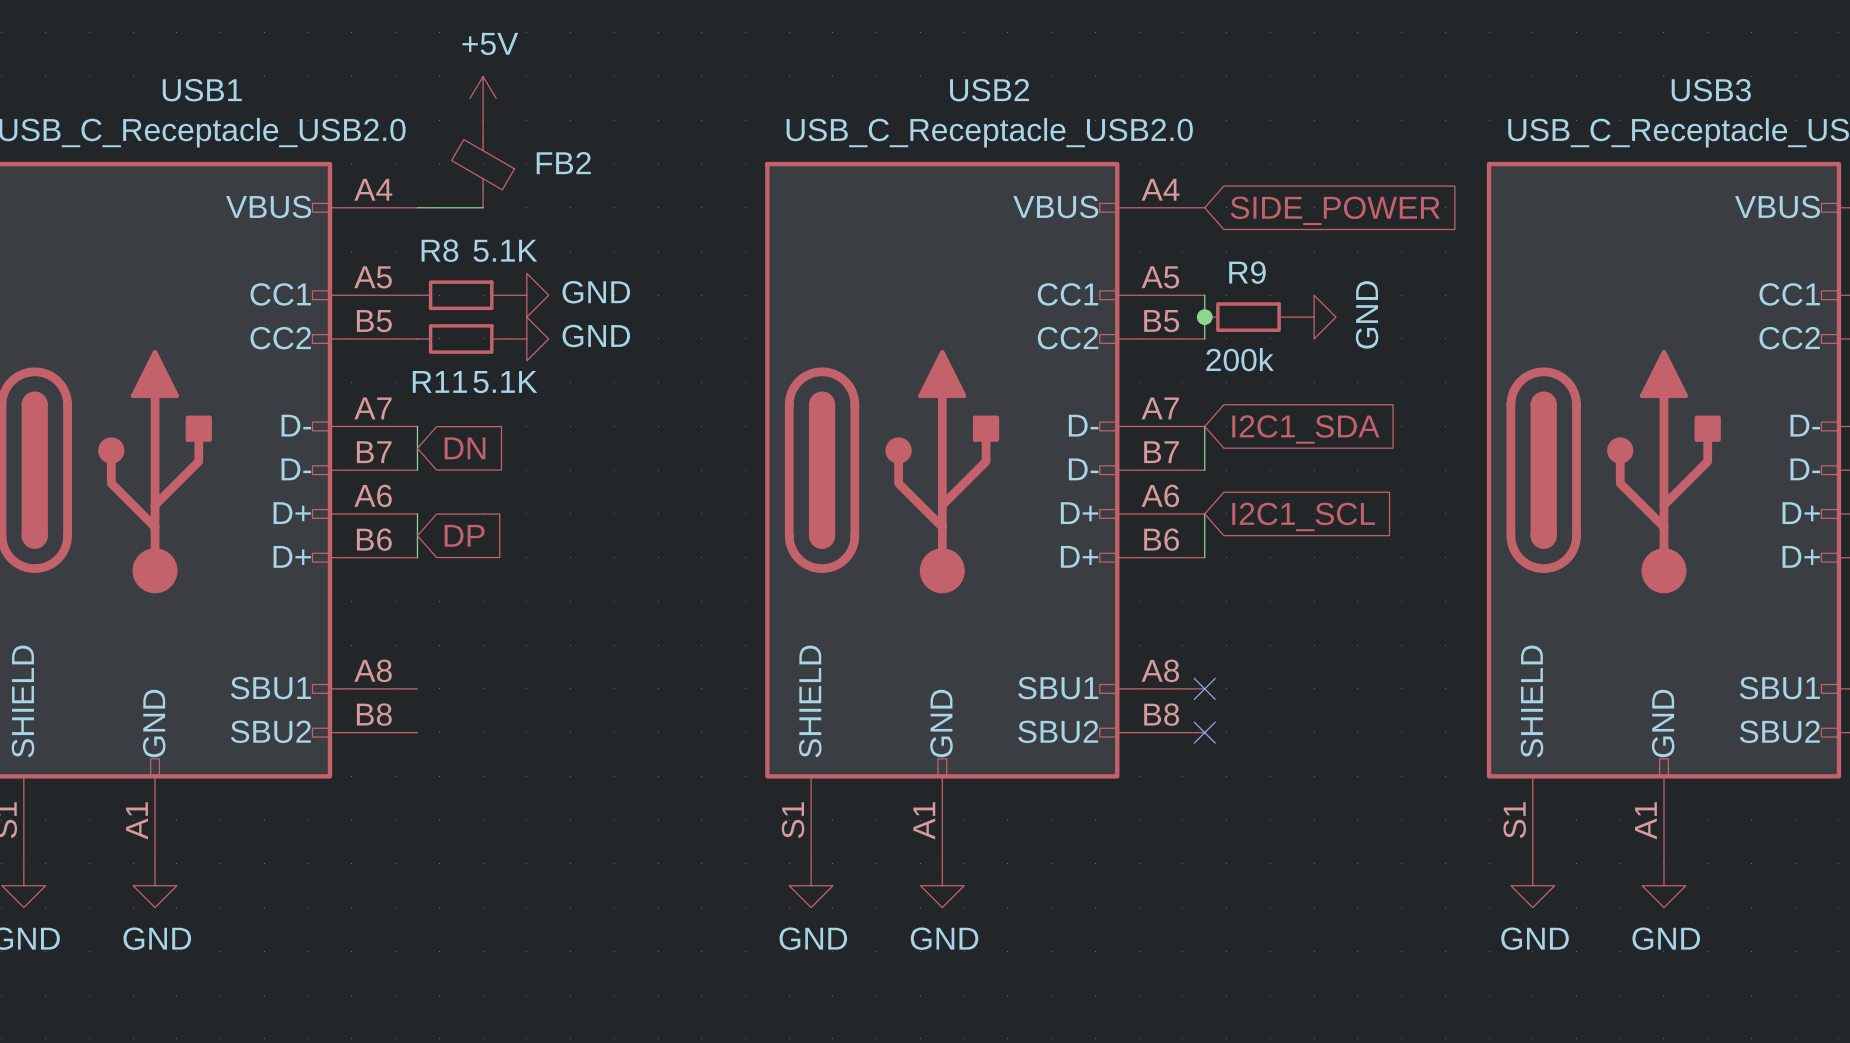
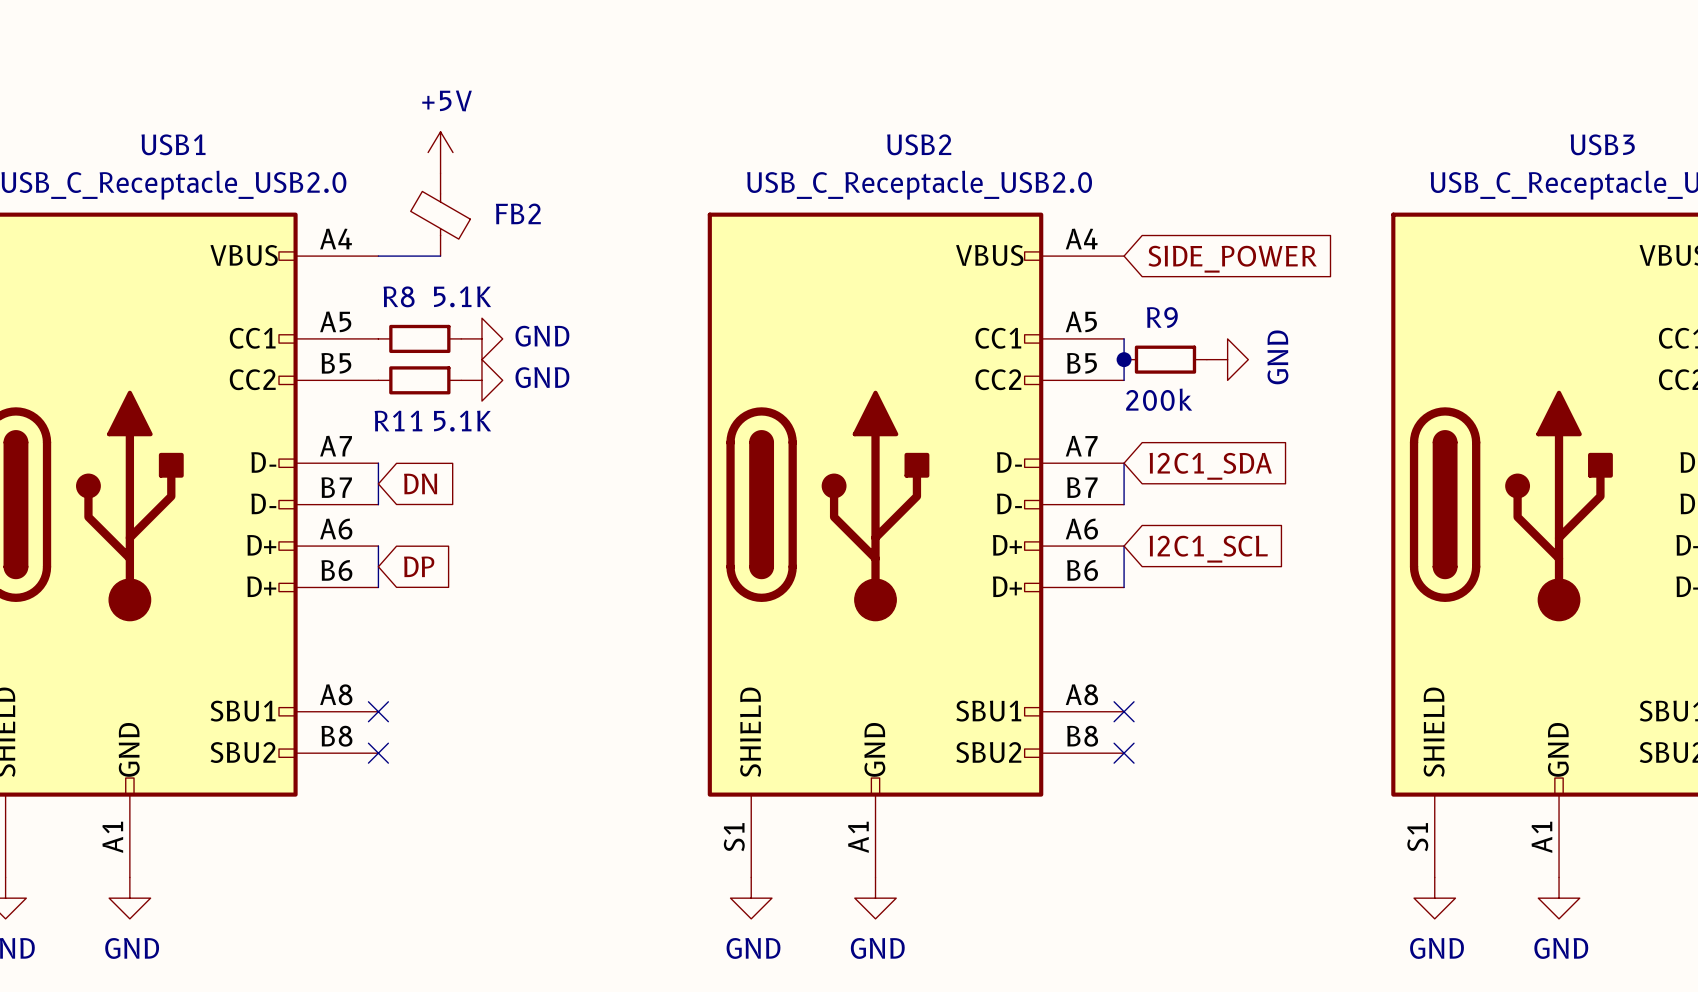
no-connect mark: none -> (378, 711)
no-connect mark: none -> (378, 753)

